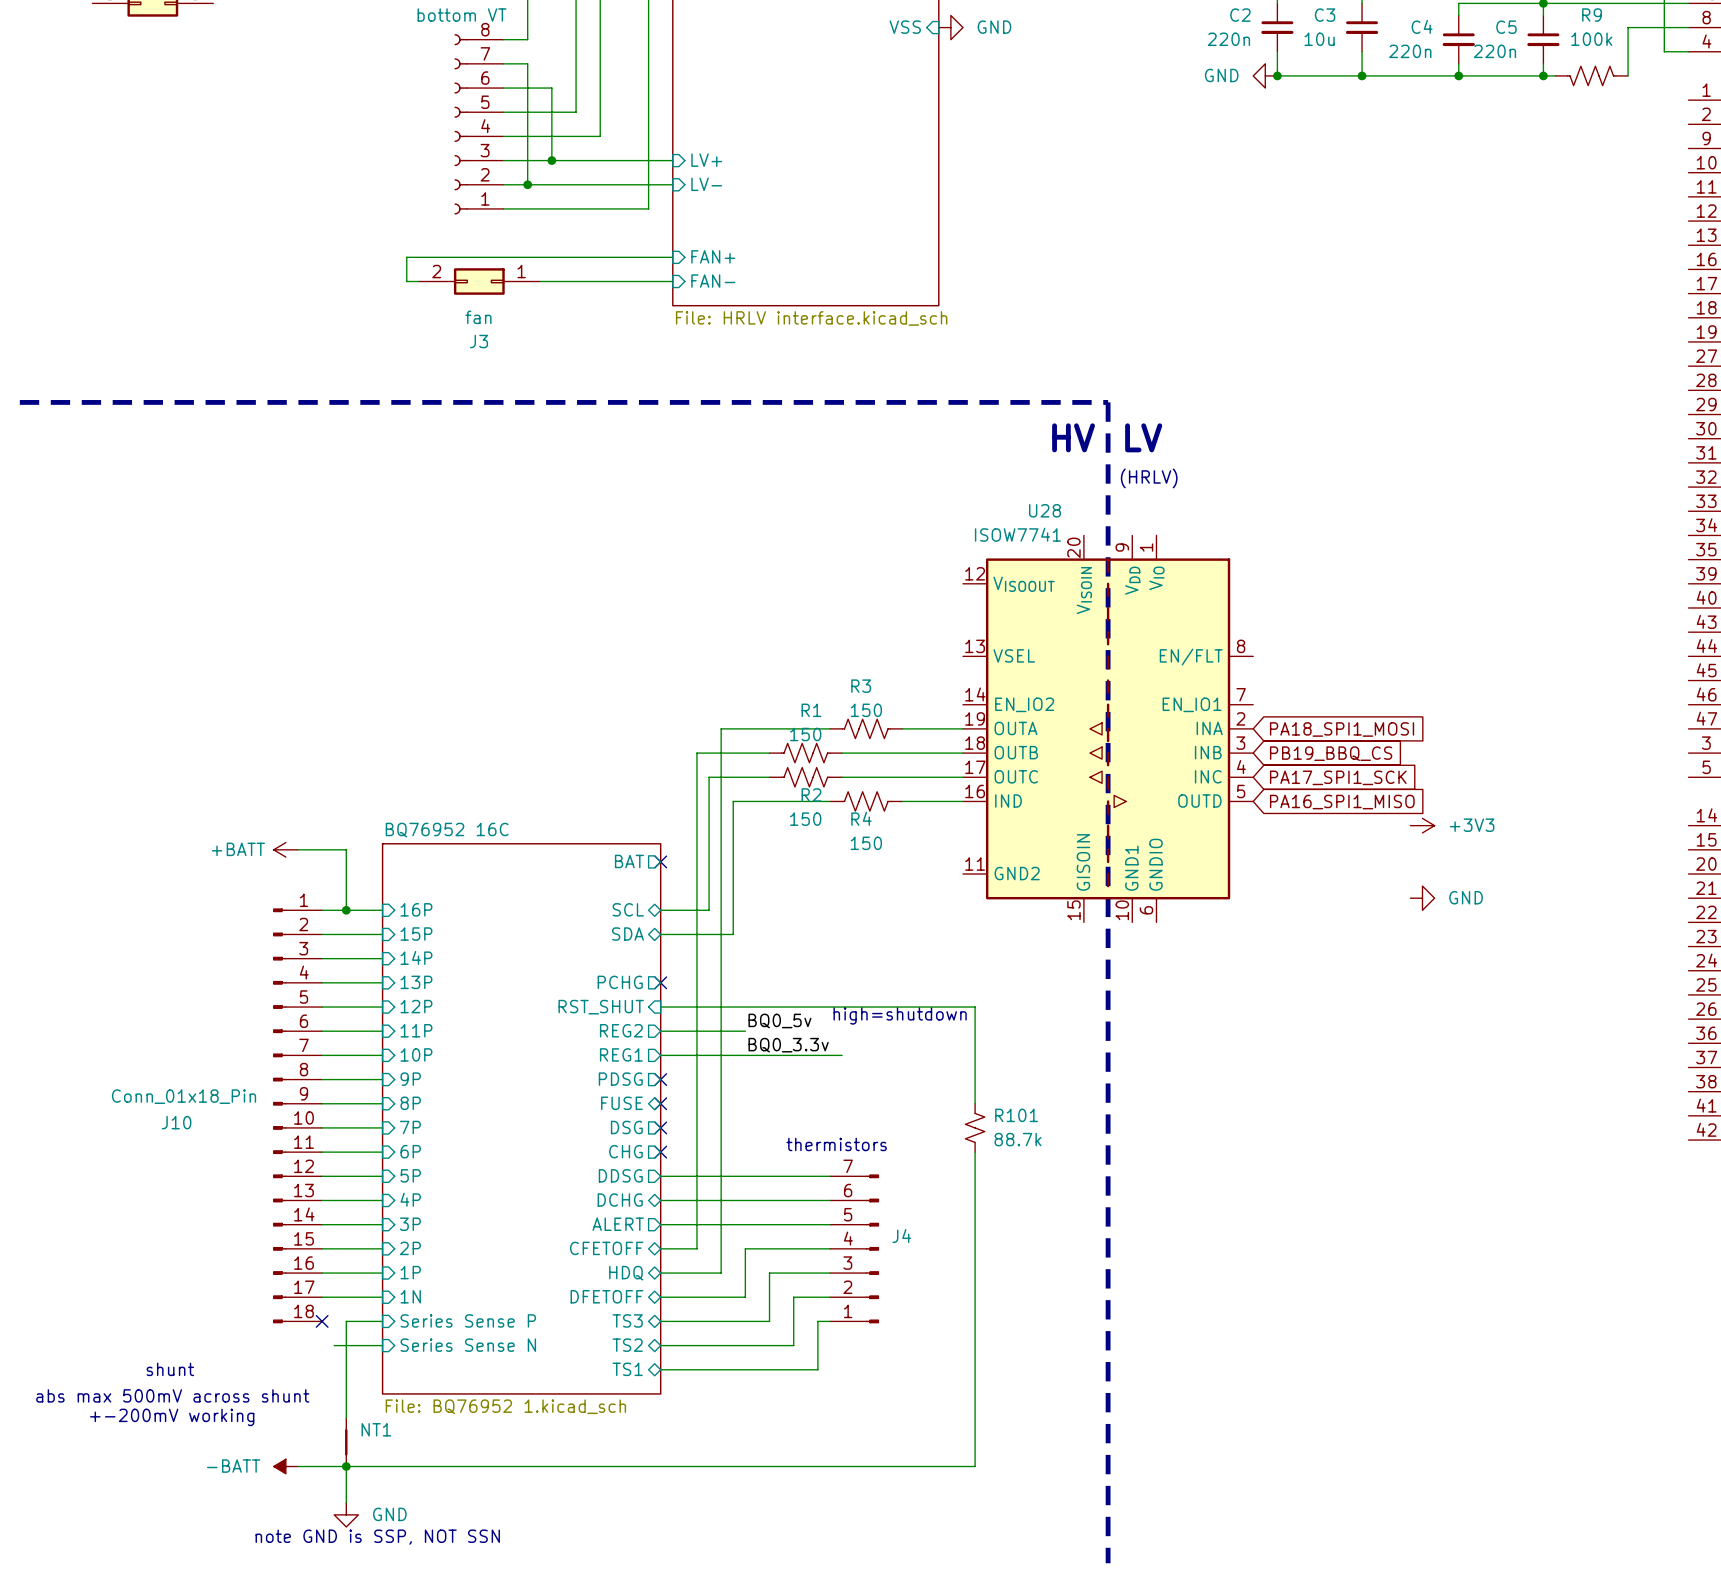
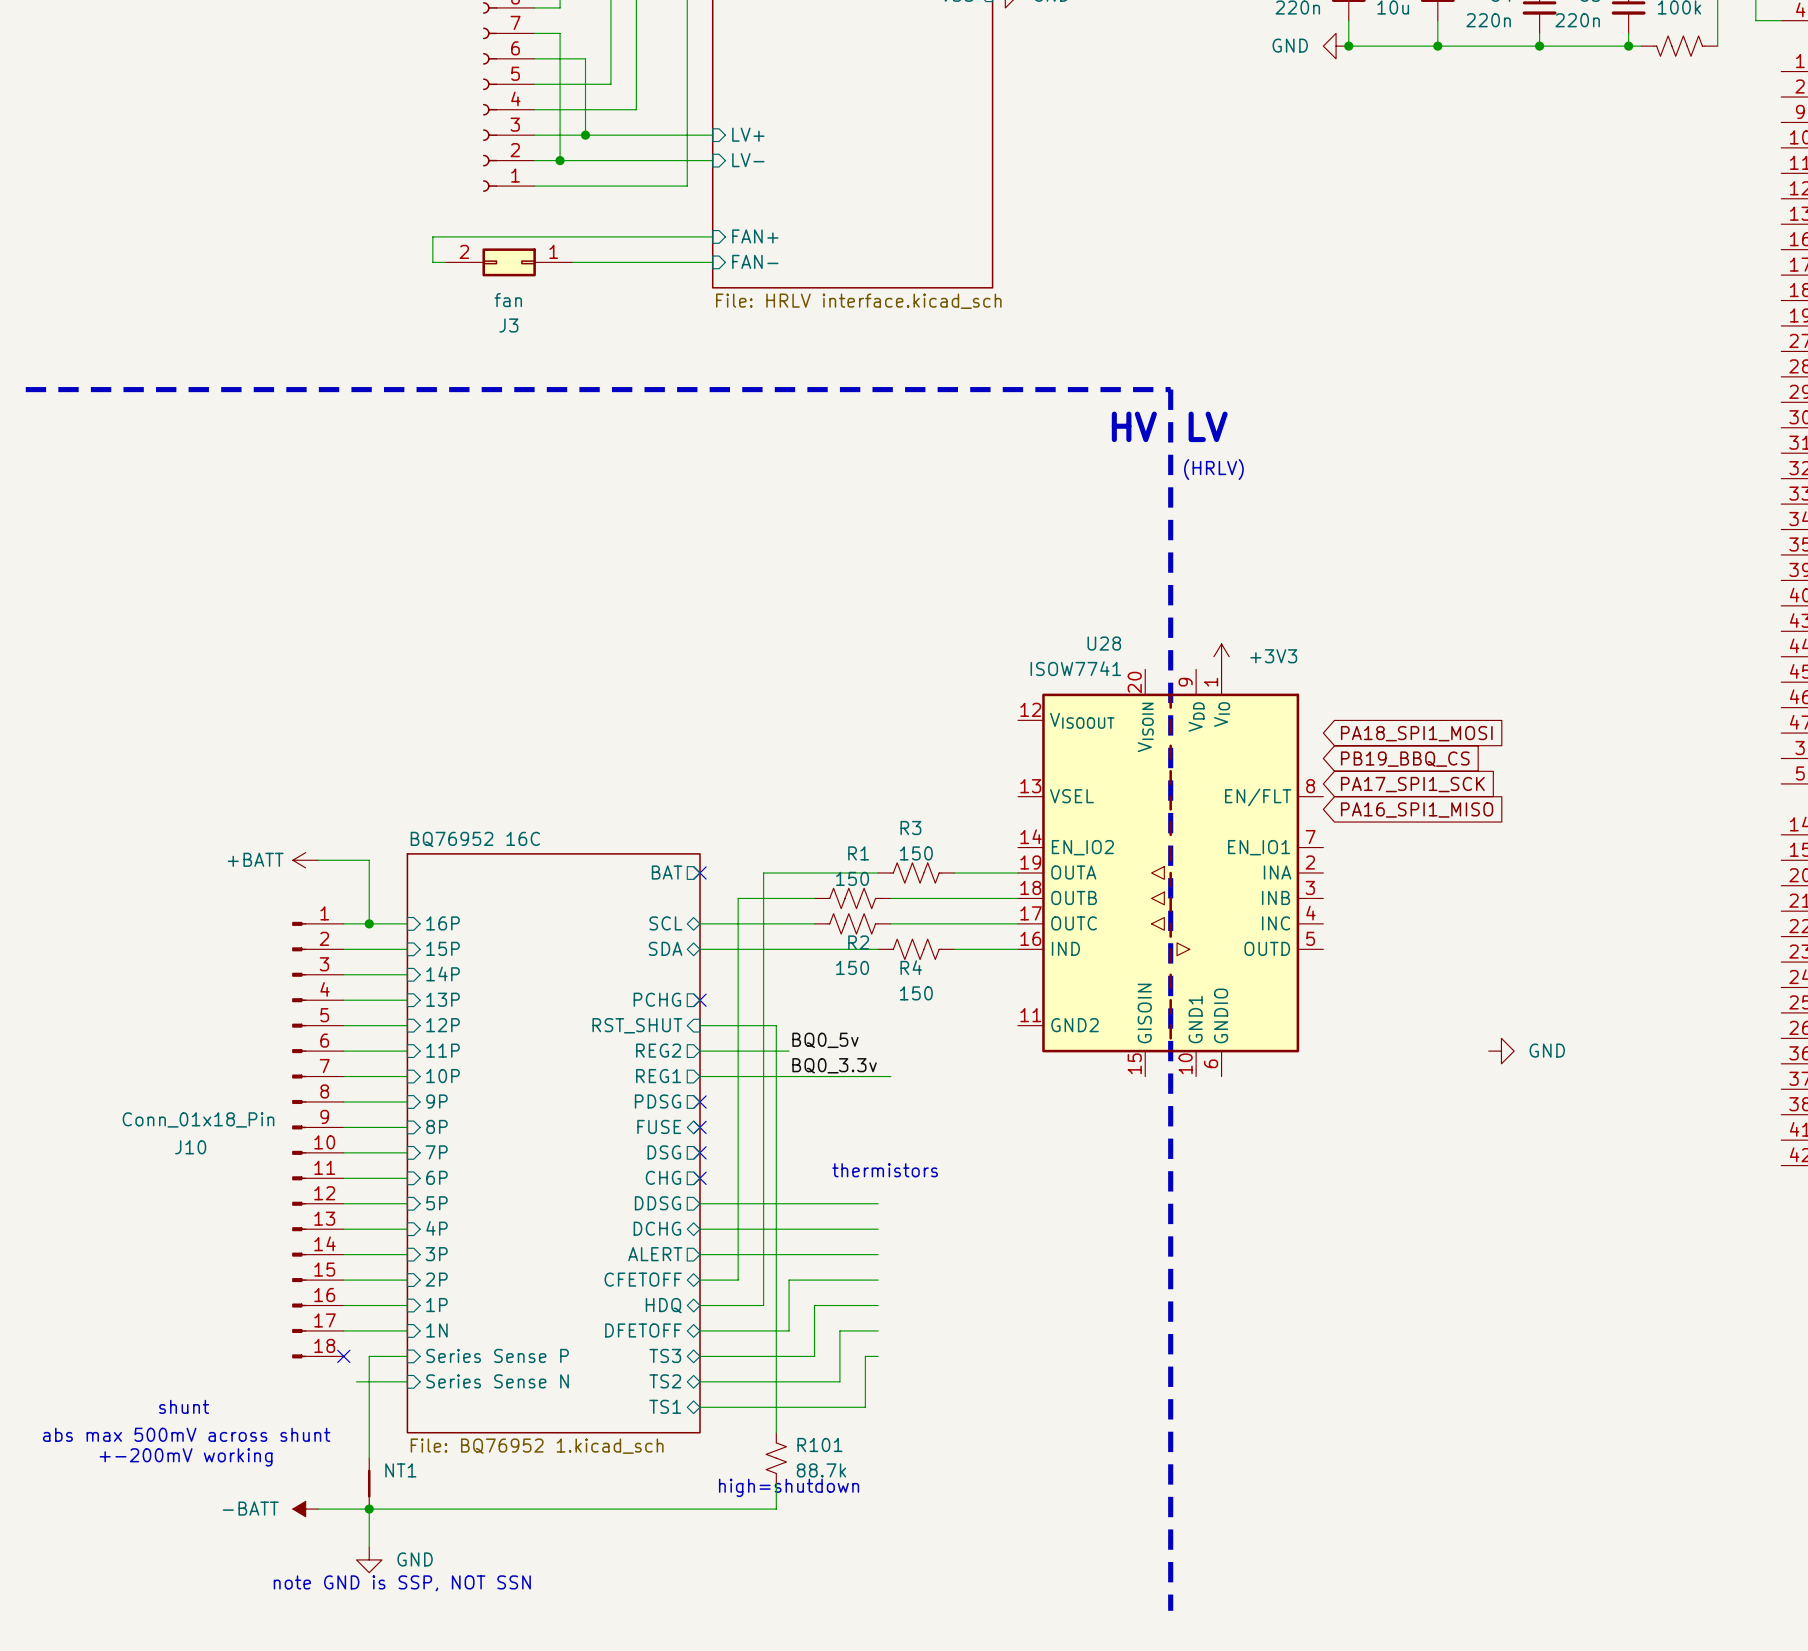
power symbol: none -> +3V3 (1221, 656)
wire: (829, 728) (721, 728) (721, 861) -> (878, 873) (763, 873)
R3 position: (866, 728) -> (916, 873)
wire: (902, 728) (962, 728) -> (954, 873) (1018, 873)
U28 position: (1108, 728) -> (1170, 873)
wire: (769, 753) (696, 753) (696, 886) -> (814, 898) (738, 898)
R1 position: (805, 753) -> (852, 898)
wire: (842, 753) (962, 753) -> (890, 898) (1018, 898)
wire: (769, 777) (709, 777) (709, 910) -> (814, 923) (750, 923)
R2 position: (805, 777) -> (852, 923)
wire: (842, 777) (962, 777) -> (890, 923) (1018, 923)
wire: (829, 801) (733, 801) (733, 934) -> (878, 949) (776, 949)
R4 position: (866, 801) -> (916, 949)
wire: (902, 801) (962, 801) -> (954, 949) (1018, 949)
power symbol: +3V3 (1422, 825) -> none
power symbol position: GND (1422, 898) -> GND (1501, 1051)
wire: (733, 1007) (975, 1007) (975, 1103) -> (776, 1025) (776, 1432)
text: high=shutdown (900, 1015) -> none
R101 position: (975, 1127) -> (776, 1458)
wire: (975, 1152) (975, 1466) (733, 1466) -> (776, 1483) (776, 1509)
J4: (854, 1248) -> none
text: none -> high=shutdown (789, 1487)

